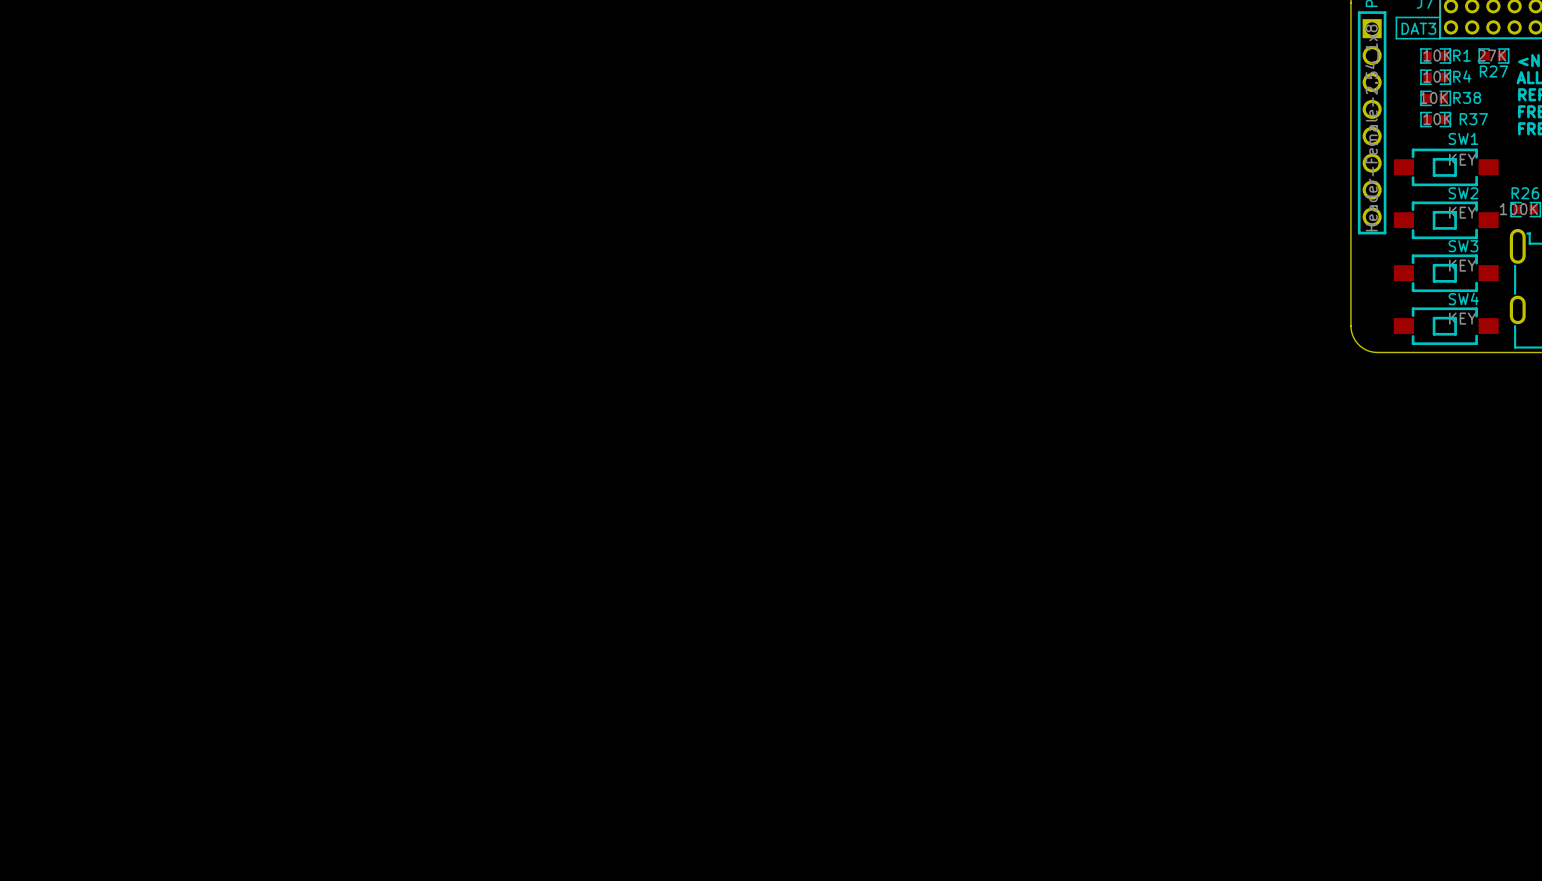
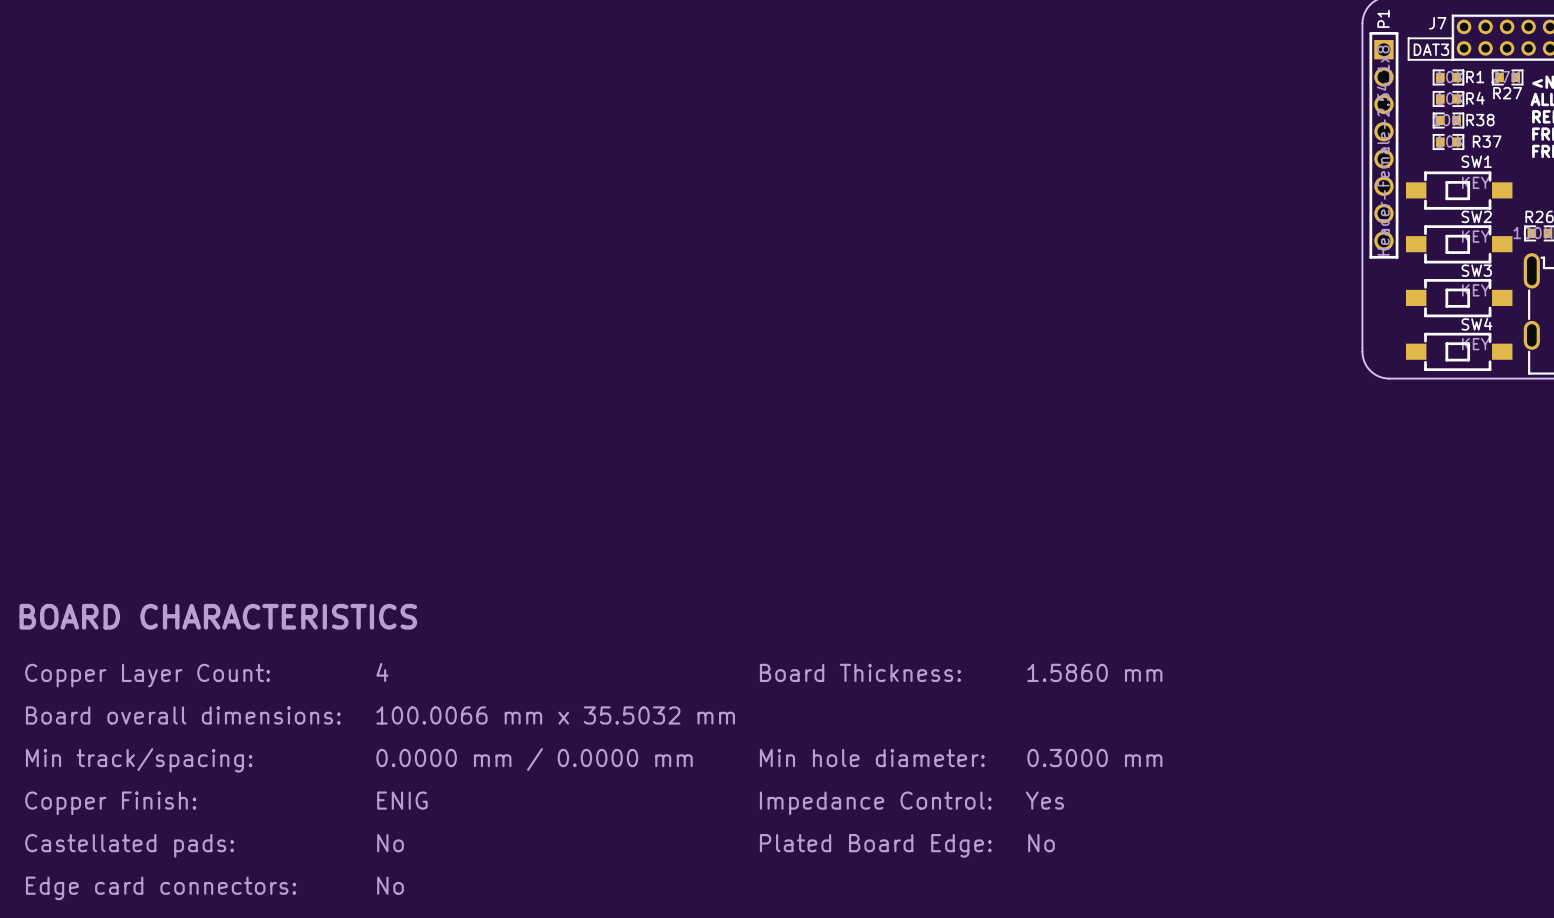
text: none -> BOARD CHARACTERISTICS (218, 616)
text: none -> 4 (382, 672)
text: none -> Board Thickness: (860, 672)
text: none -> 1.5860 mm (1094, 672)
text: none -> Copper Layer Count: (147, 675)
text: none -> Board overall dimensions: (183, 715)
text: none -> 100.0066 mm x 35.5032 mm (555, 715)
text: none -> Min hole diameter: (872, 758)
text: none -> 0.3000 mm (1094, 758)
text: none -> 0.0000 mm / 0.0000 mm (534, 759)
text: none -> Min track/spacing: (139, 760)
text: none -> ENIG (402, 800)
text: none -> Yes (1044, 800)
text: none -> Copper Finish: (110, 803)
text: none -> Impedance Control: (875, 803)
text: none -> No (390, 843)
text: none -> No (1041, 843)
text: none -> Castellated pads: (129, 845)
text: none -> Plated Board Edge: (875, 845)
text: none -> No (390, 885)
text: none -> Edge card connectors: (161, 888)

